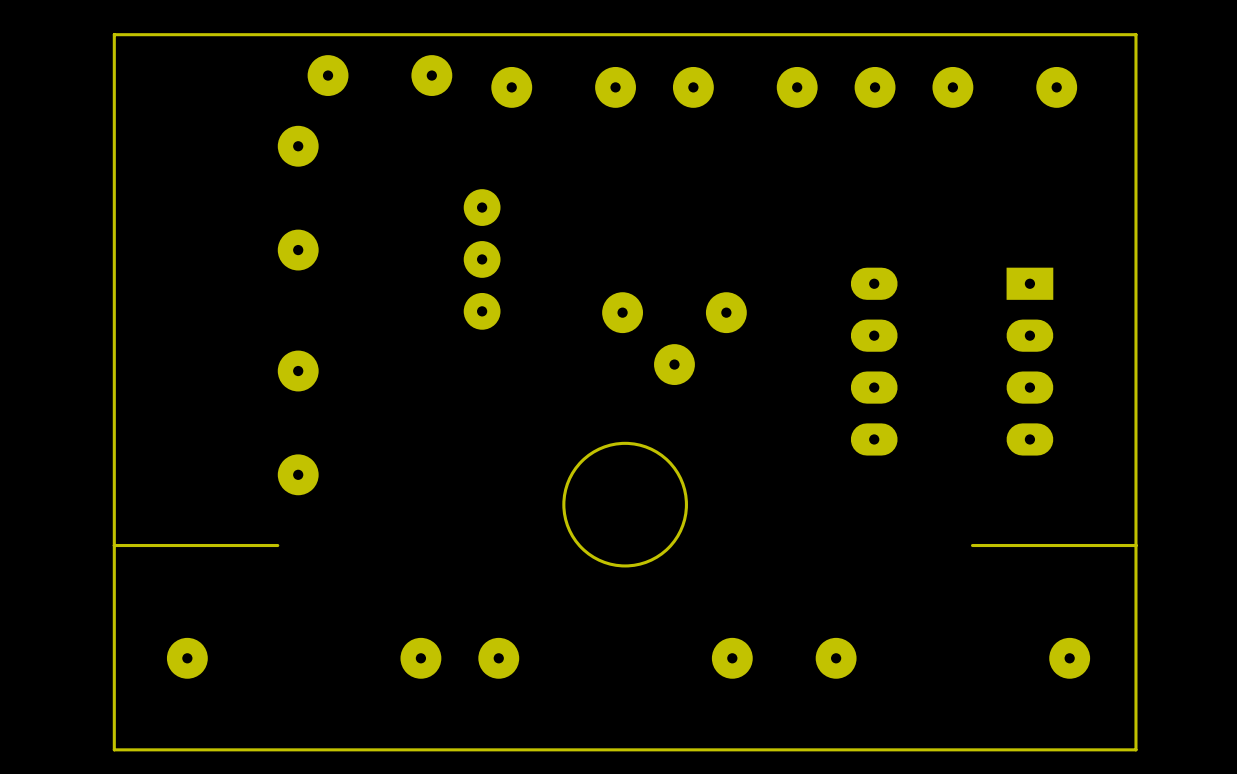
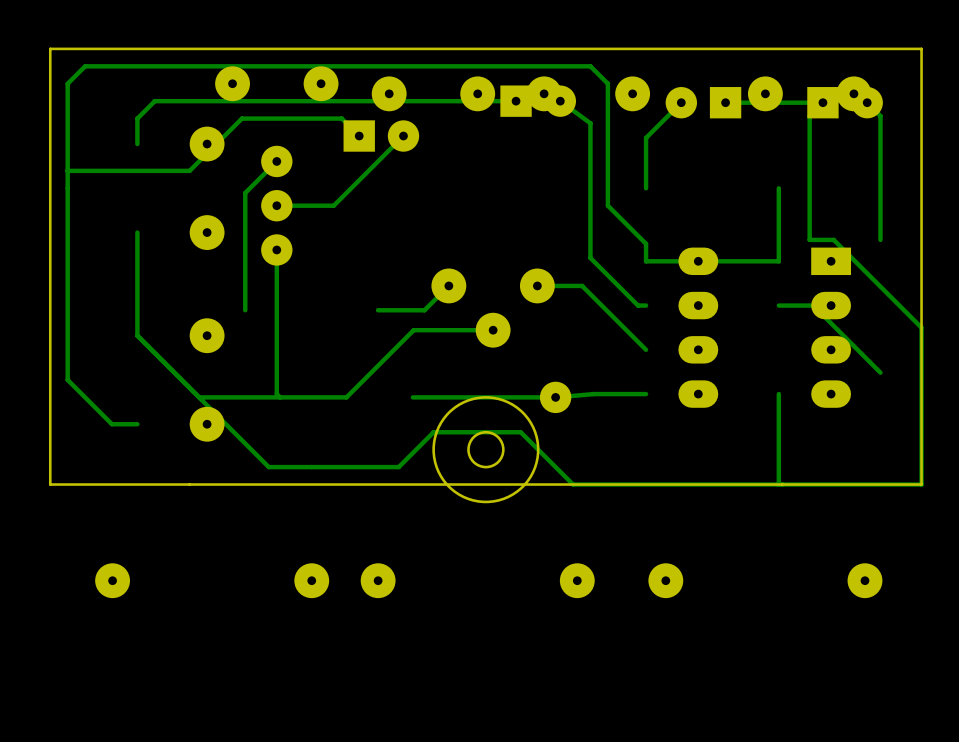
part footprint: [854, 66, 896, 108] -> [665, 87, 742, 119]
bottom track: none -> (516, 101) (154, 101) (137, 118) (137, 144)
part: none -> (538, 101)
bottom track: none -> (560, 101) (590, 123) (590, 257) (638, 305) (646, 305)
bottom track: none -> (681, 102) (646, 137) (646, 188)
bottom track: none -> (725, 102) (822, 102) (809, 115) (809, 239) (833, 239) (921, 327) (921, 484) (573, 484) (520, 432) (433, 432) (398, 467) (268, 467) (137, 335) (137, 232)
part: none -> (845, 102)
bottom track: none -> (867, 102) (880, 115) (880, 239)
bottom track: none -> (359, 136) (341, 118) (241, 118) (189, 170) (67, 170)
part: none -> (381, 136)
bottom track: none -> (403, 136) (333, 205) (276, 205)
bottom track: none -> (276, 161) (245, 192) (245, 310)
bottom track: none -> (778, 188) (778, 261) (646, 261) (646, 243) (607, 205) (607, 83) (590, 66) (85, 66) (67, 83) (67, 379) (111, 424) (137, 424)
part position: (482, 259) -> (276, 205)
bottom track: none -> (276, 249) (276, 394) (280, 397)
bottom track: none -> (448, 285) (424, 310) (378, 310)
bottom track: none -> (537, 285) (582, 285) (646, 349)
bottom track: none -> (778, 305) (813, 305) (880, 372)
part position: (674, 338) -> (493, 308)
bottom track: none -> (493, 330) (413, 330) (346, 397) (199, 397)
bottom track: none -> (646, 394) (593, 394) (555, 397) (412, 397)
bottom track: none -> (778, 394) (778, 484)
part: none -> (555, 397)
round board edge: none -> [467, 430, 505, 469]
board edge: none -> (782, 484) (189, 484)
board edge: (1135, 545) (1135, 749) (114, 749) (114, 545) -> none

